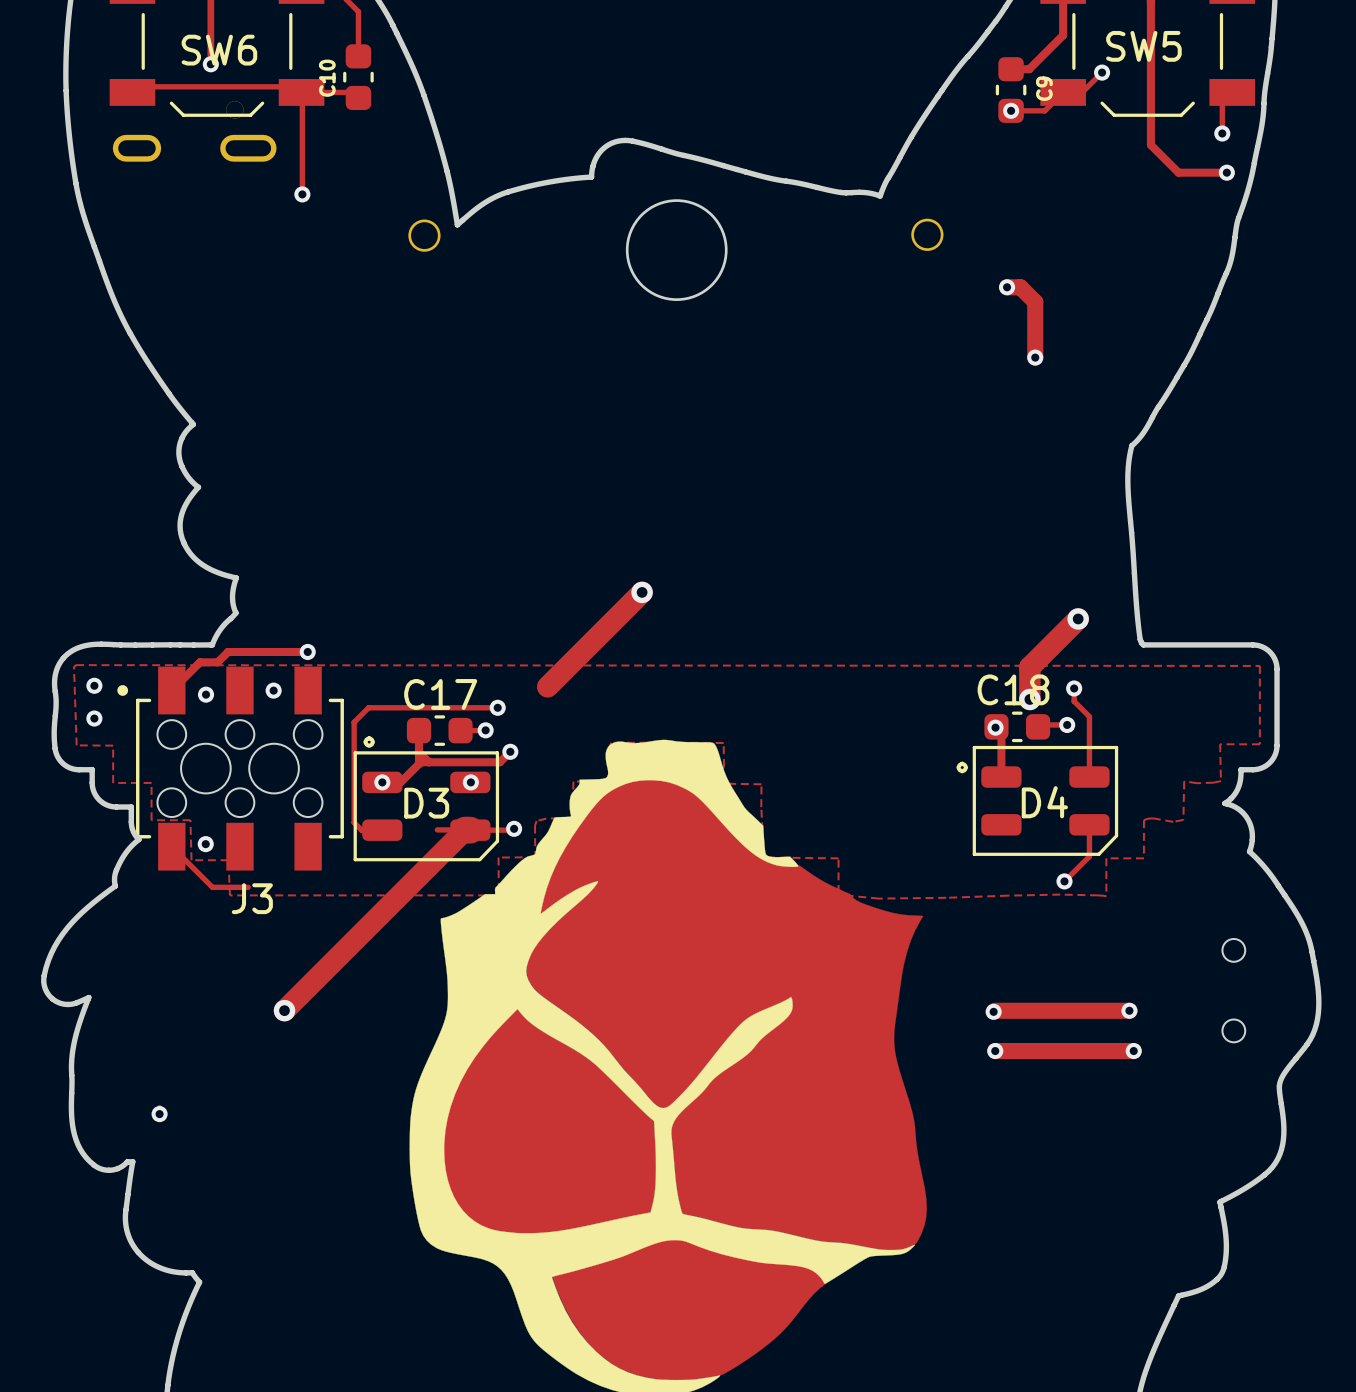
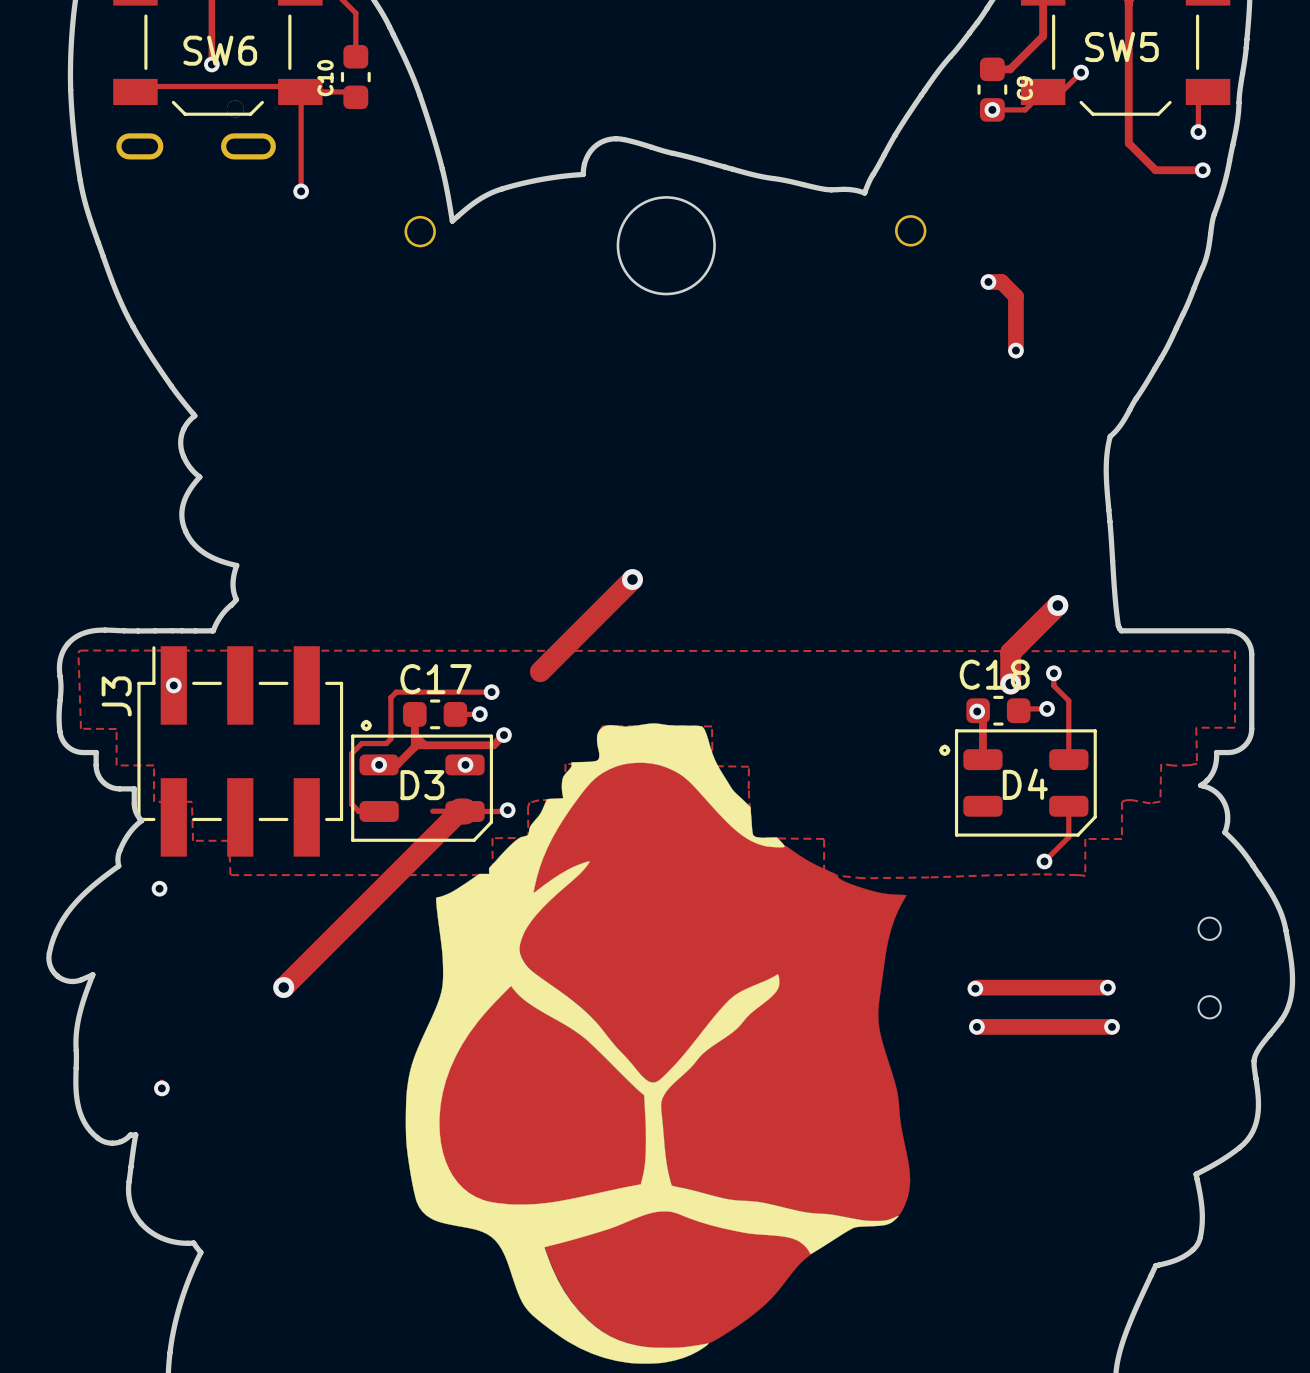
track: (307, 651) (228, 651) (217, 662) (199, 662) (171, 690) -> none
via: (307, 651) -> none
J3 footprint: [117, 666, 344, 871] -> [137, 646, 344, 857]
via: (94, 685) -> none
via: (273, 690) -> none
via position: (206, 694) -> (173, 685)
track: (400, 707) (368, 707) (354, 722) (354, 770) -> (396, 692) (390, 697) (390, 738) (386, 743) (361, 743) (351, 753)
via: (94, 718) -> none
via: (205, 844) -> none
track: (171, 846) (212, 887) (248, 887) -> none
J3 name position: J3 (252, 898) -> J3 (116, 696)
via: none -> (159, 888)

